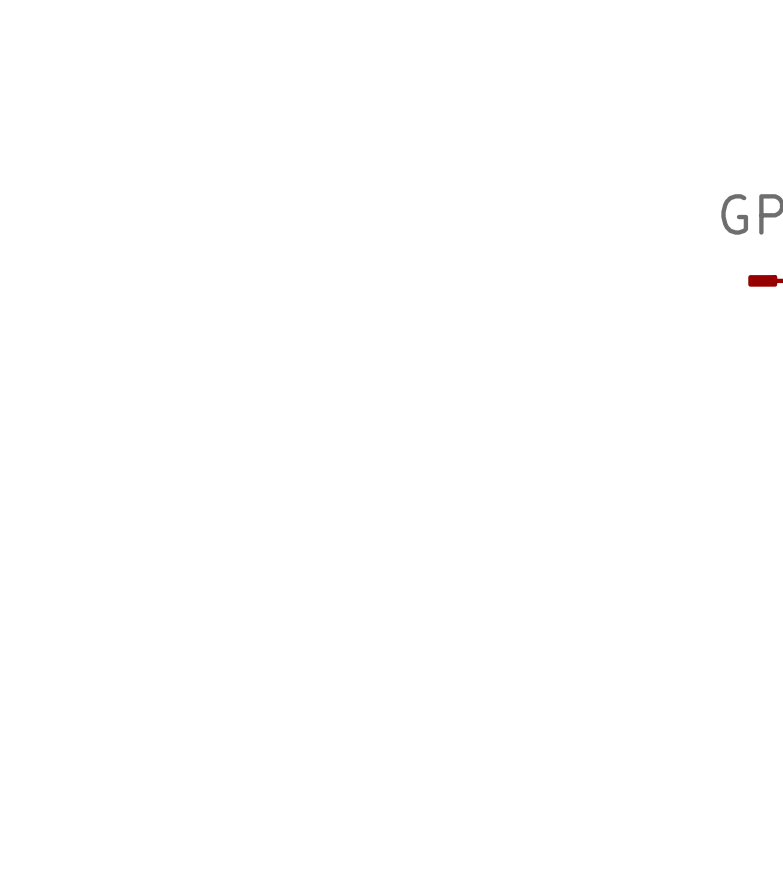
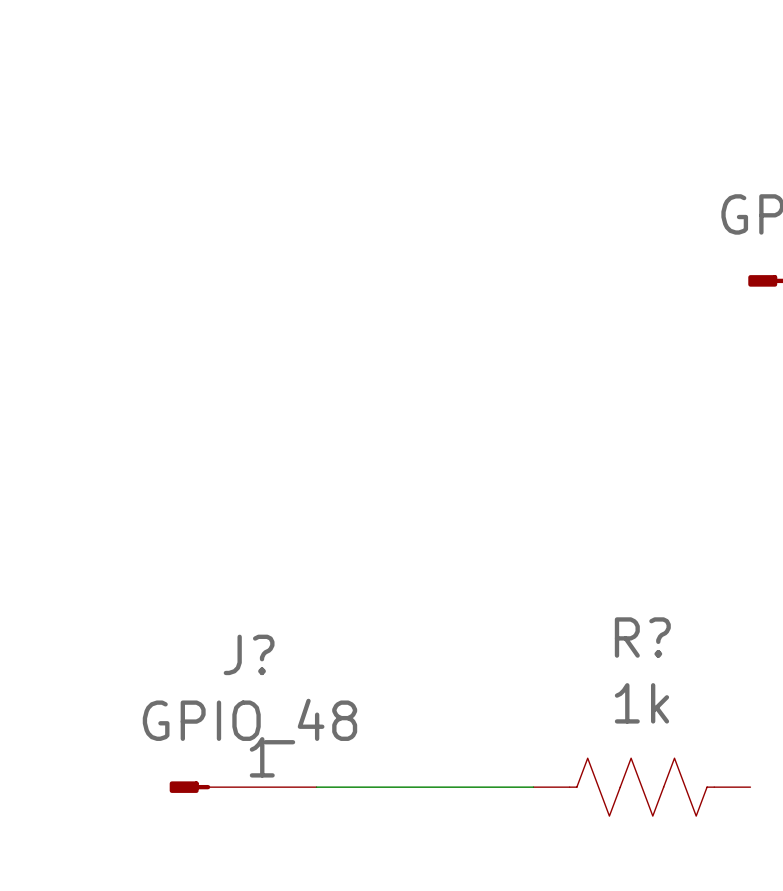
J?: none -> GPIO_48 (243, 787)
wire: none -> (316, 787) (533, 787)
R?: none -> 1k (641, 787)

